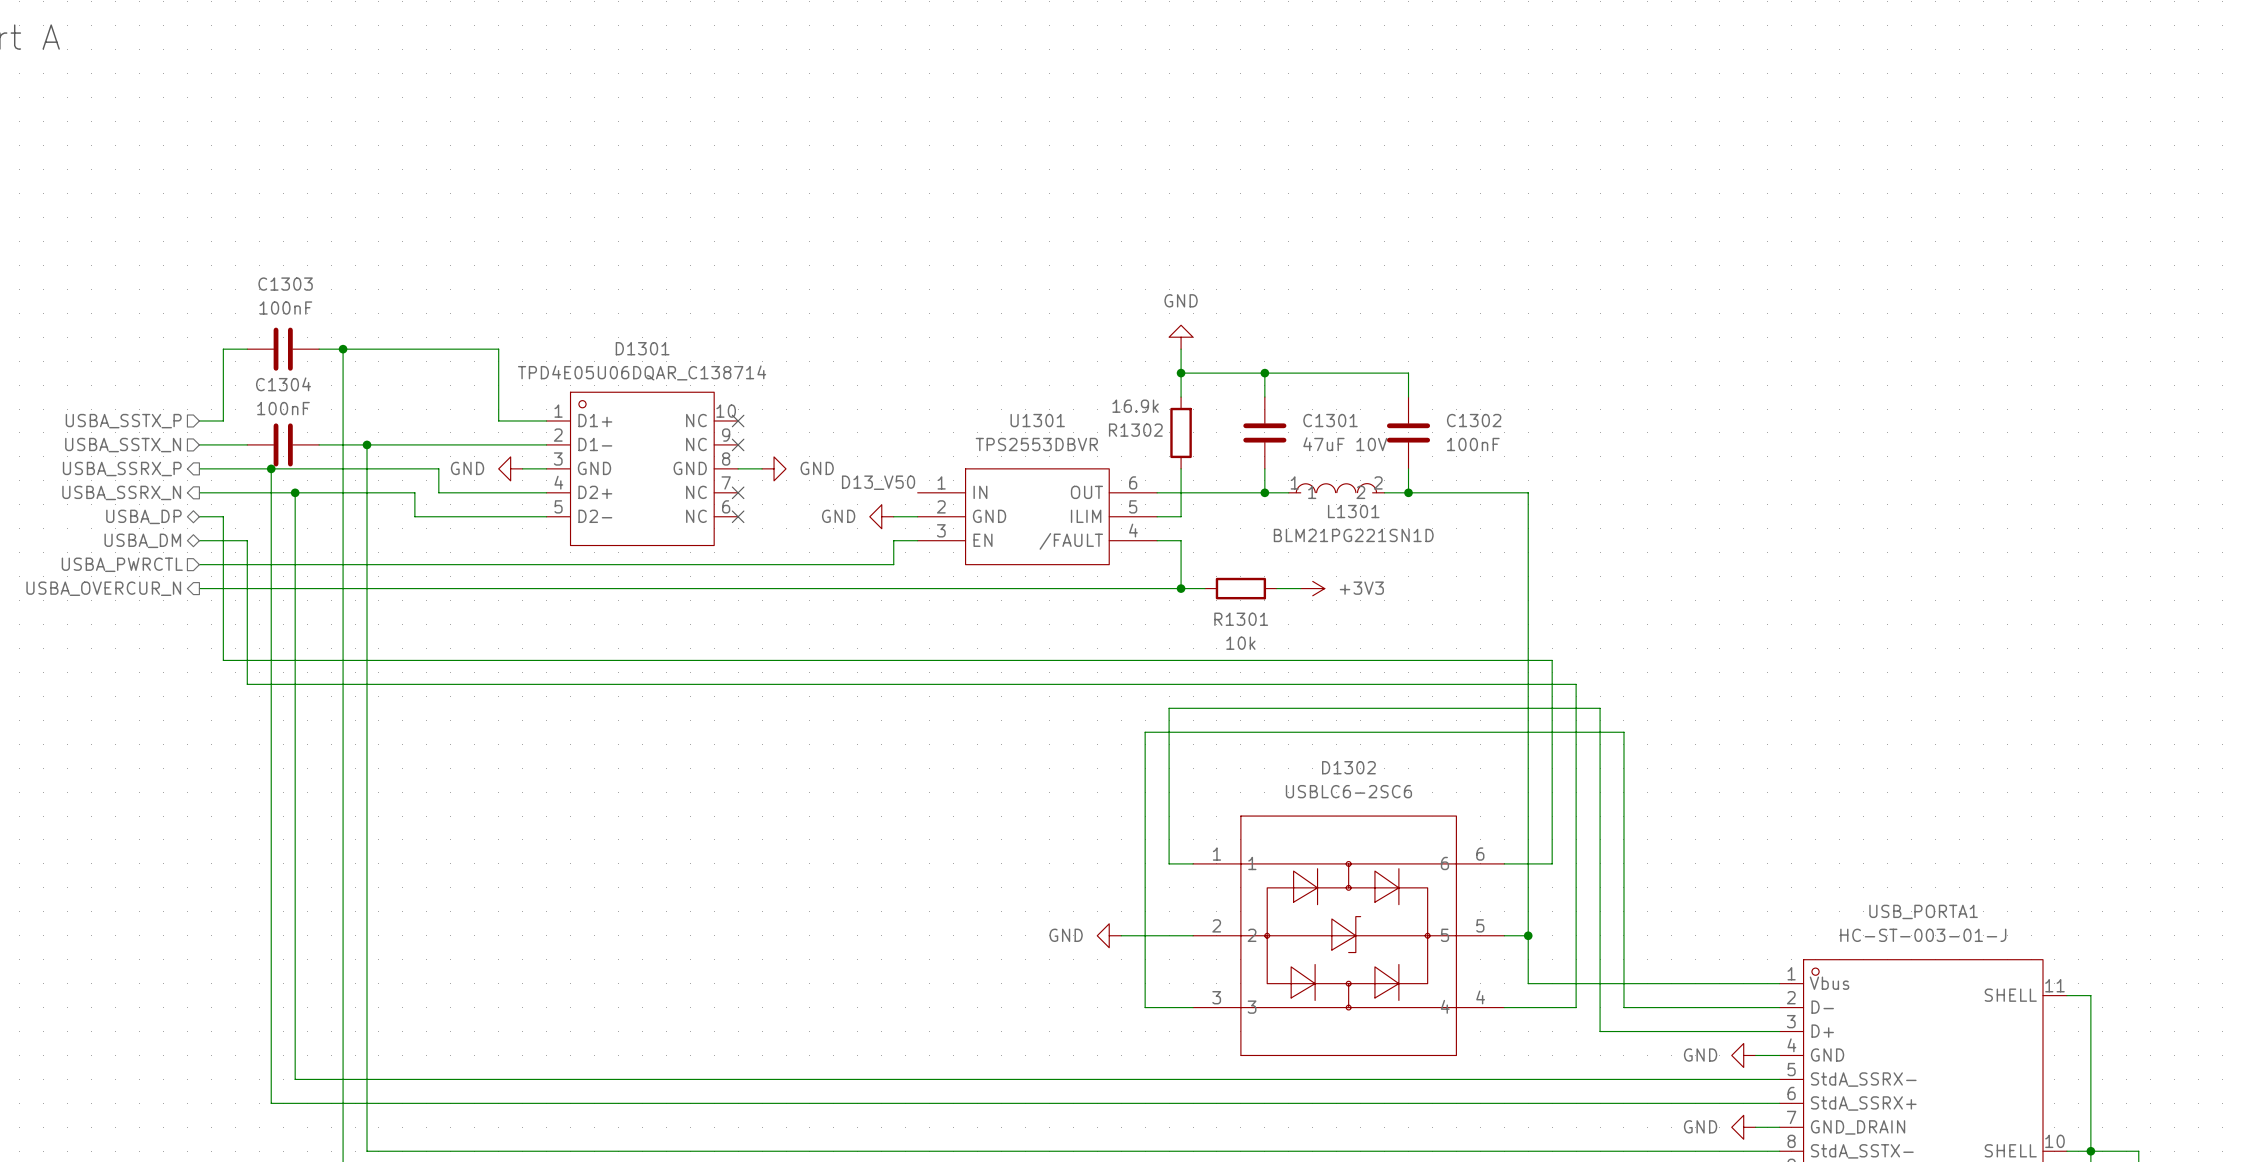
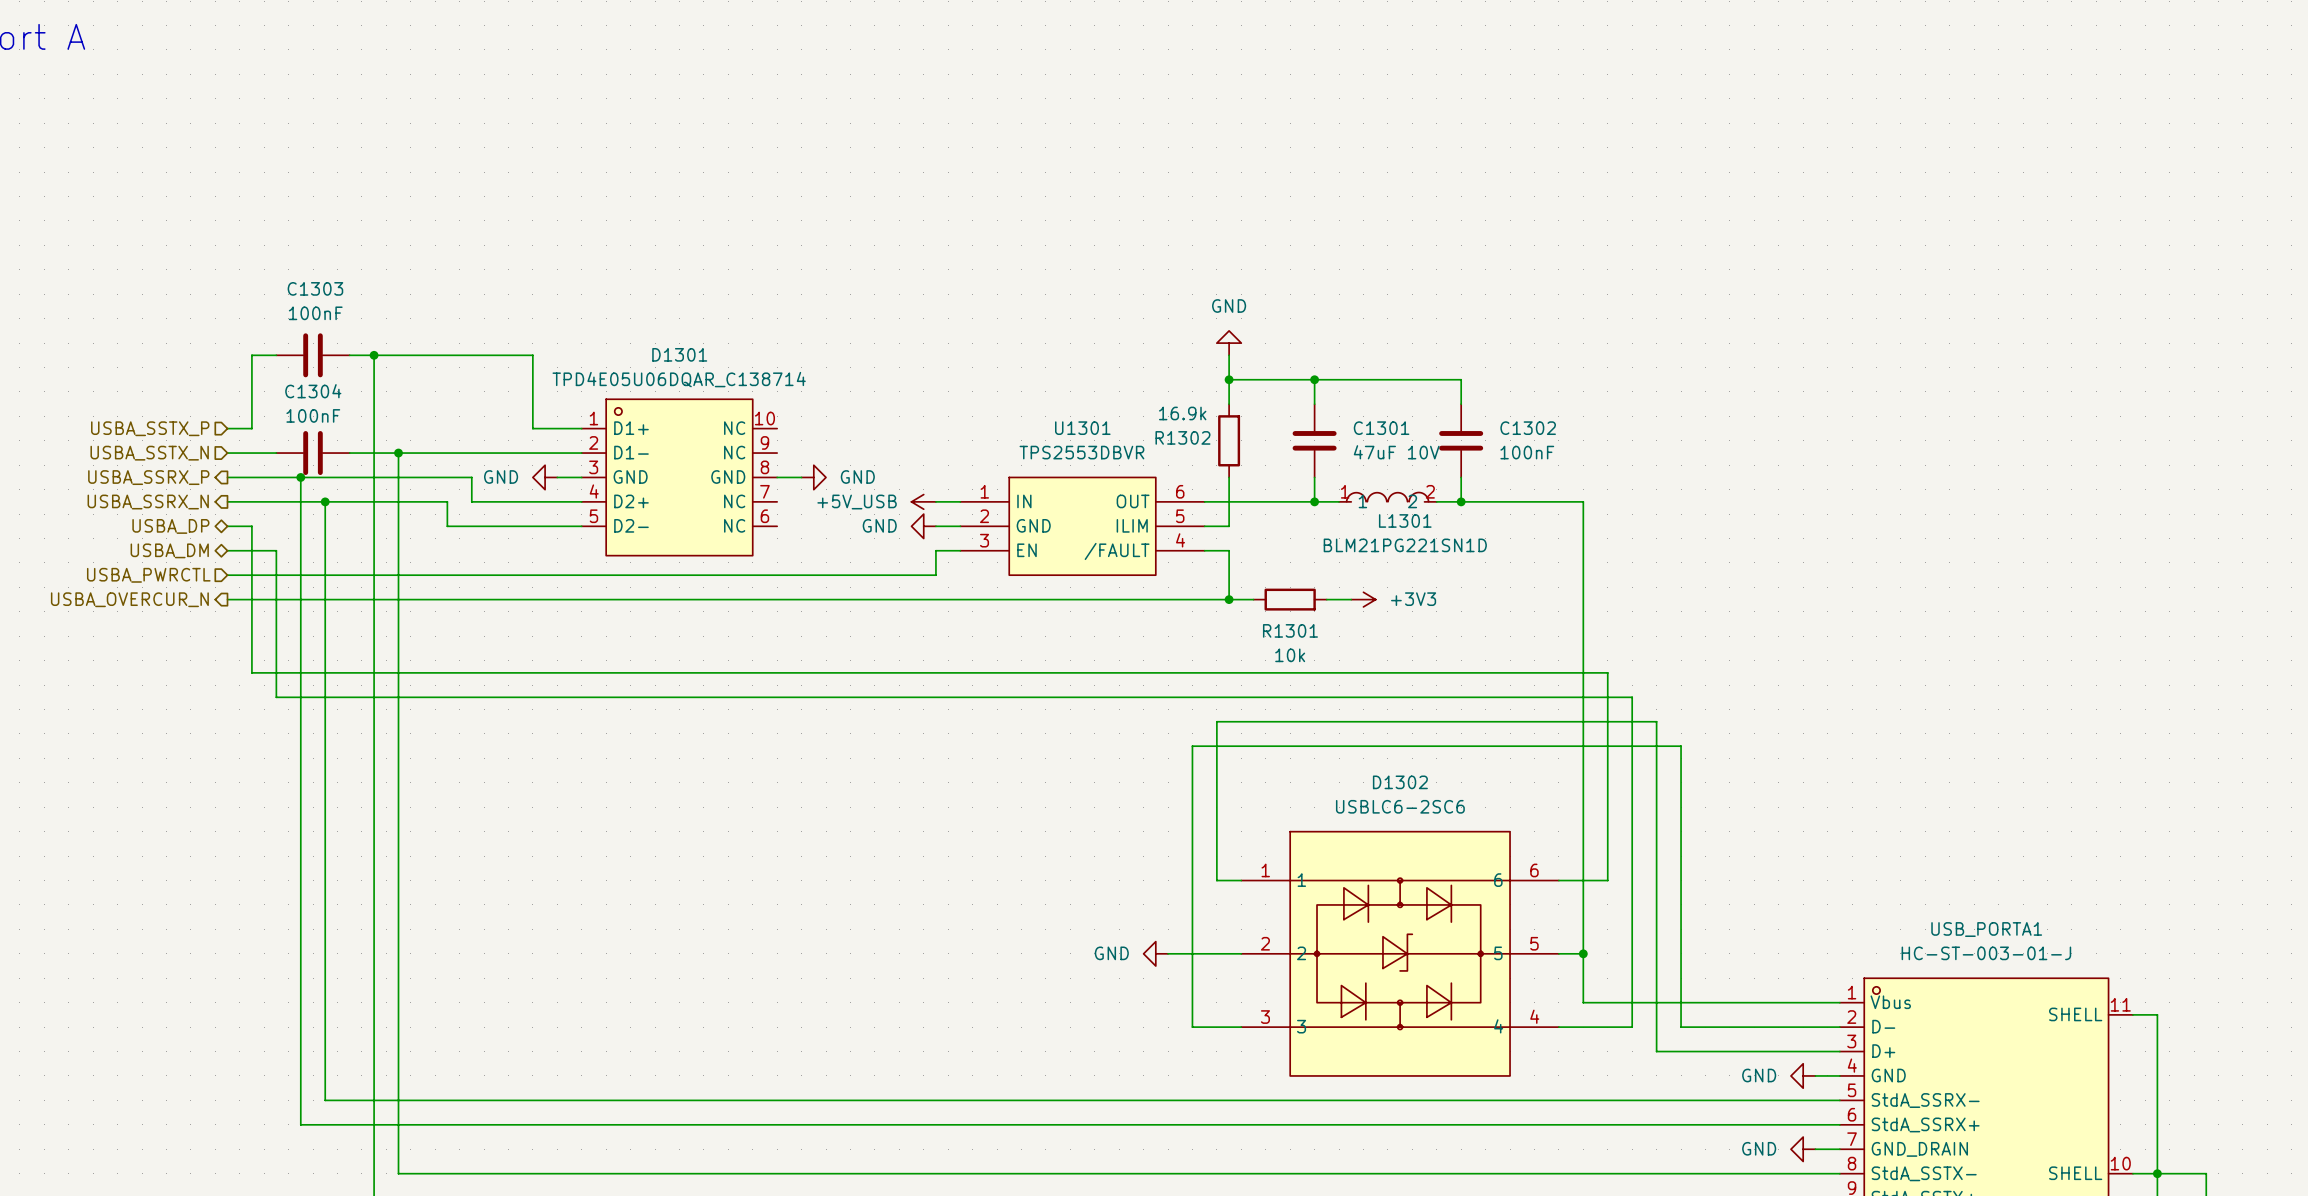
no-connect mark: (738, 420) -> none
no-connect mark: (738, 444) -> none
label: D13_V50 (878, 482) -> none
no-connect mark: (738, 492) -> none
power symbol: none -> +5V_USB (923, 501)
wire: none -> (935, 501) (960, 501)
no-connect mark: (738, 516) -> none

